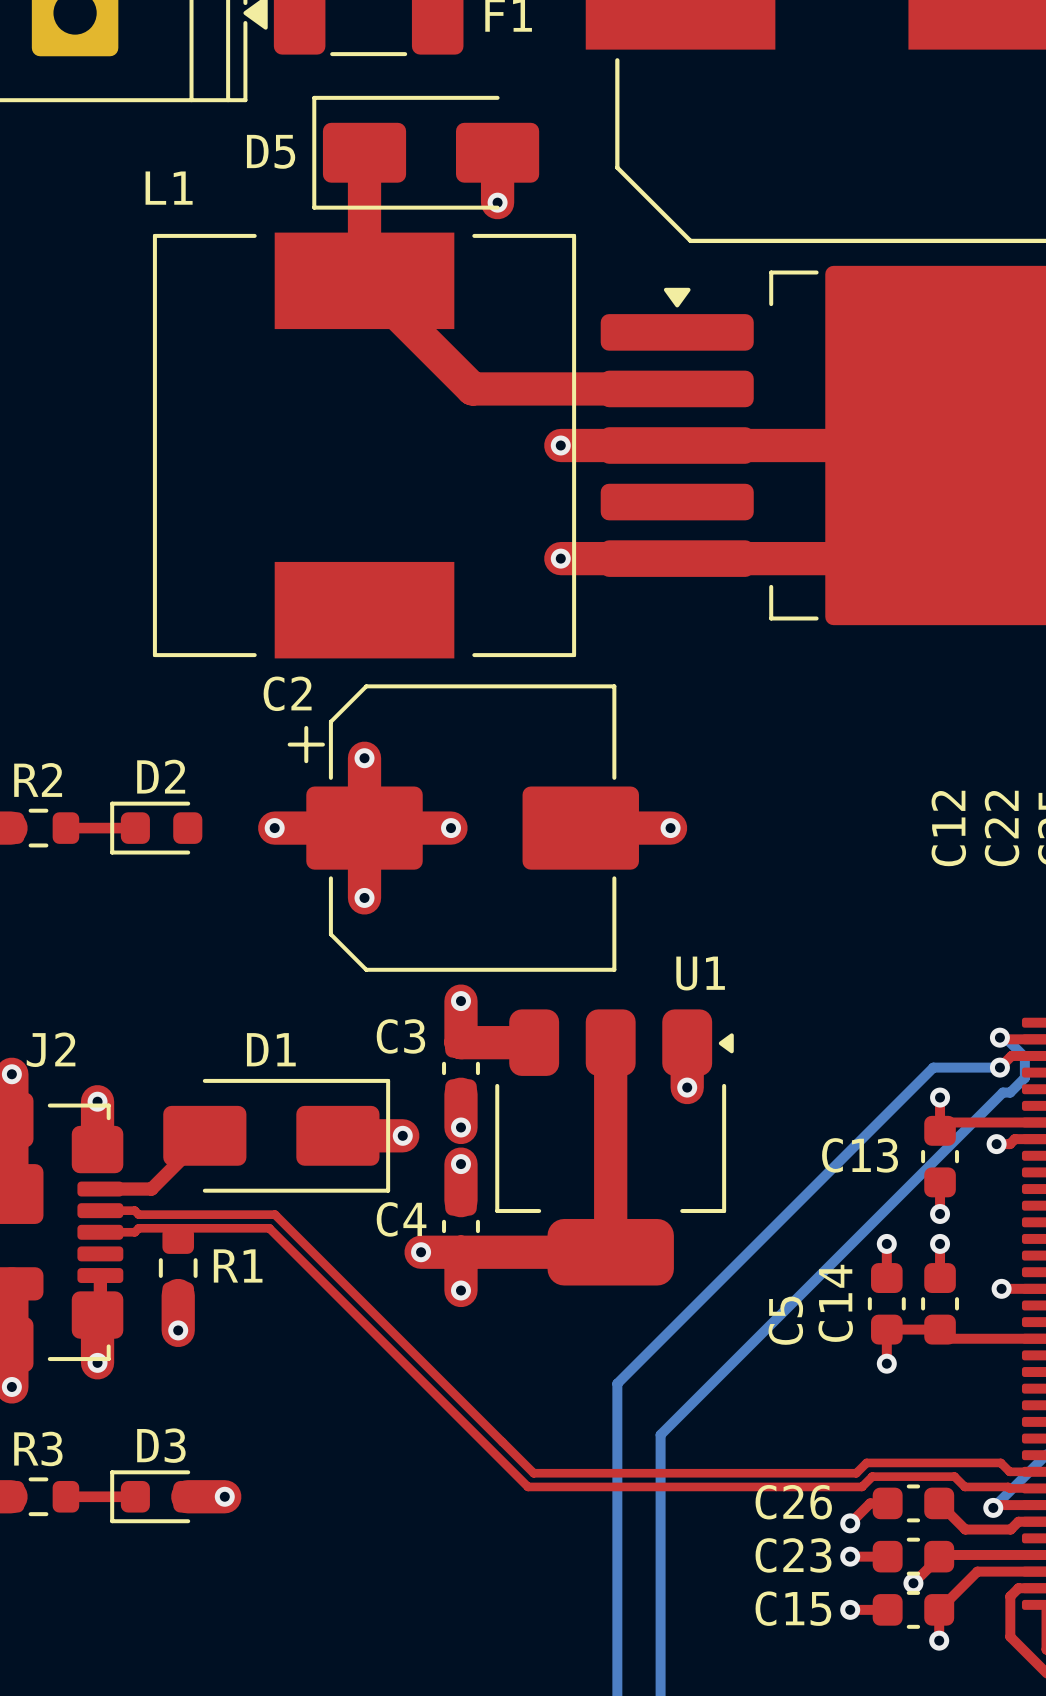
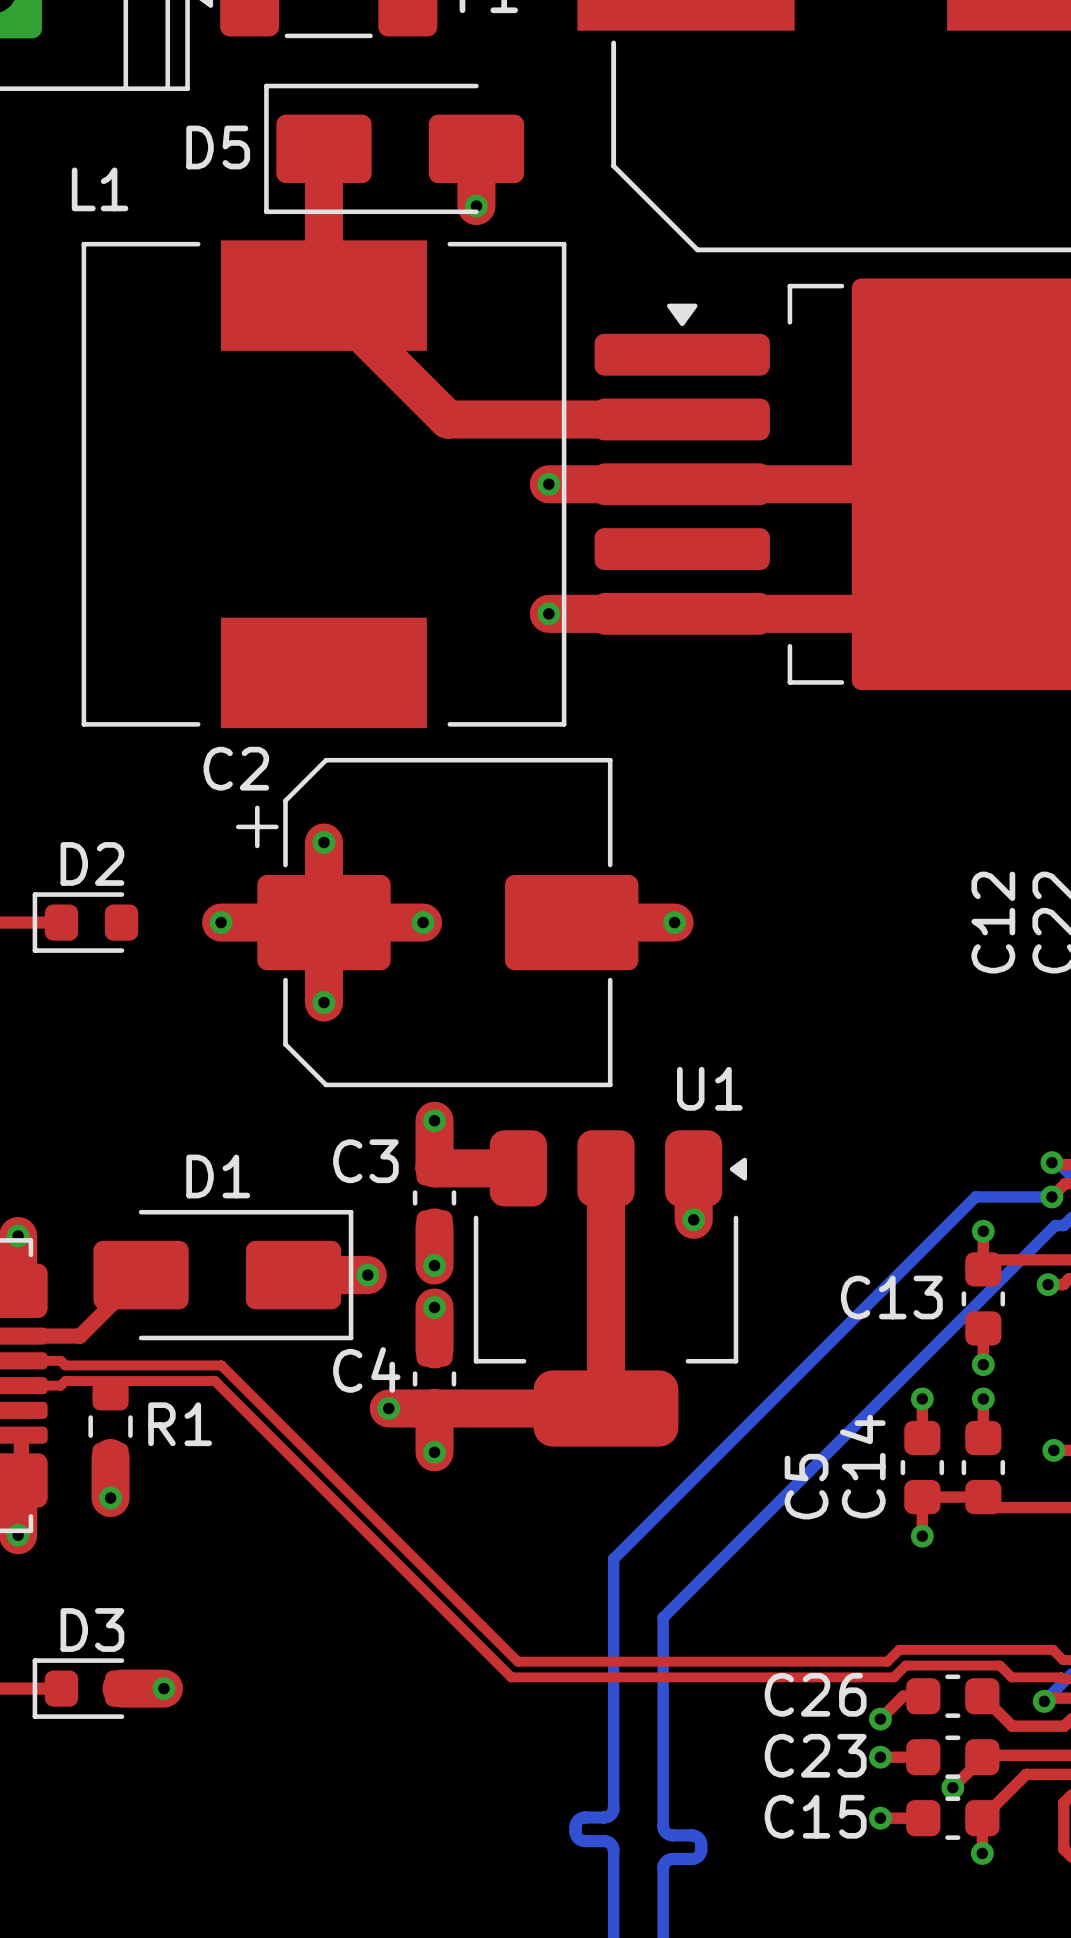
bottom track: (617, 1601) (617, 1638) -> (613, 1808) (611, 1813) (606, 1817) (580, 1818) (575, 1826) (576, 1835) (580, 1839) (606, 1841) (611, 1844) (613, 1850)
bottom track: (660, 1616) (660, 1653) -> (663, 1825) (667, 1834) (694, 1835) (699, 1839) (701, 1844) (700, 1853) (696, 1857) (670, 1859) (665, 1862) (663, 1868)

